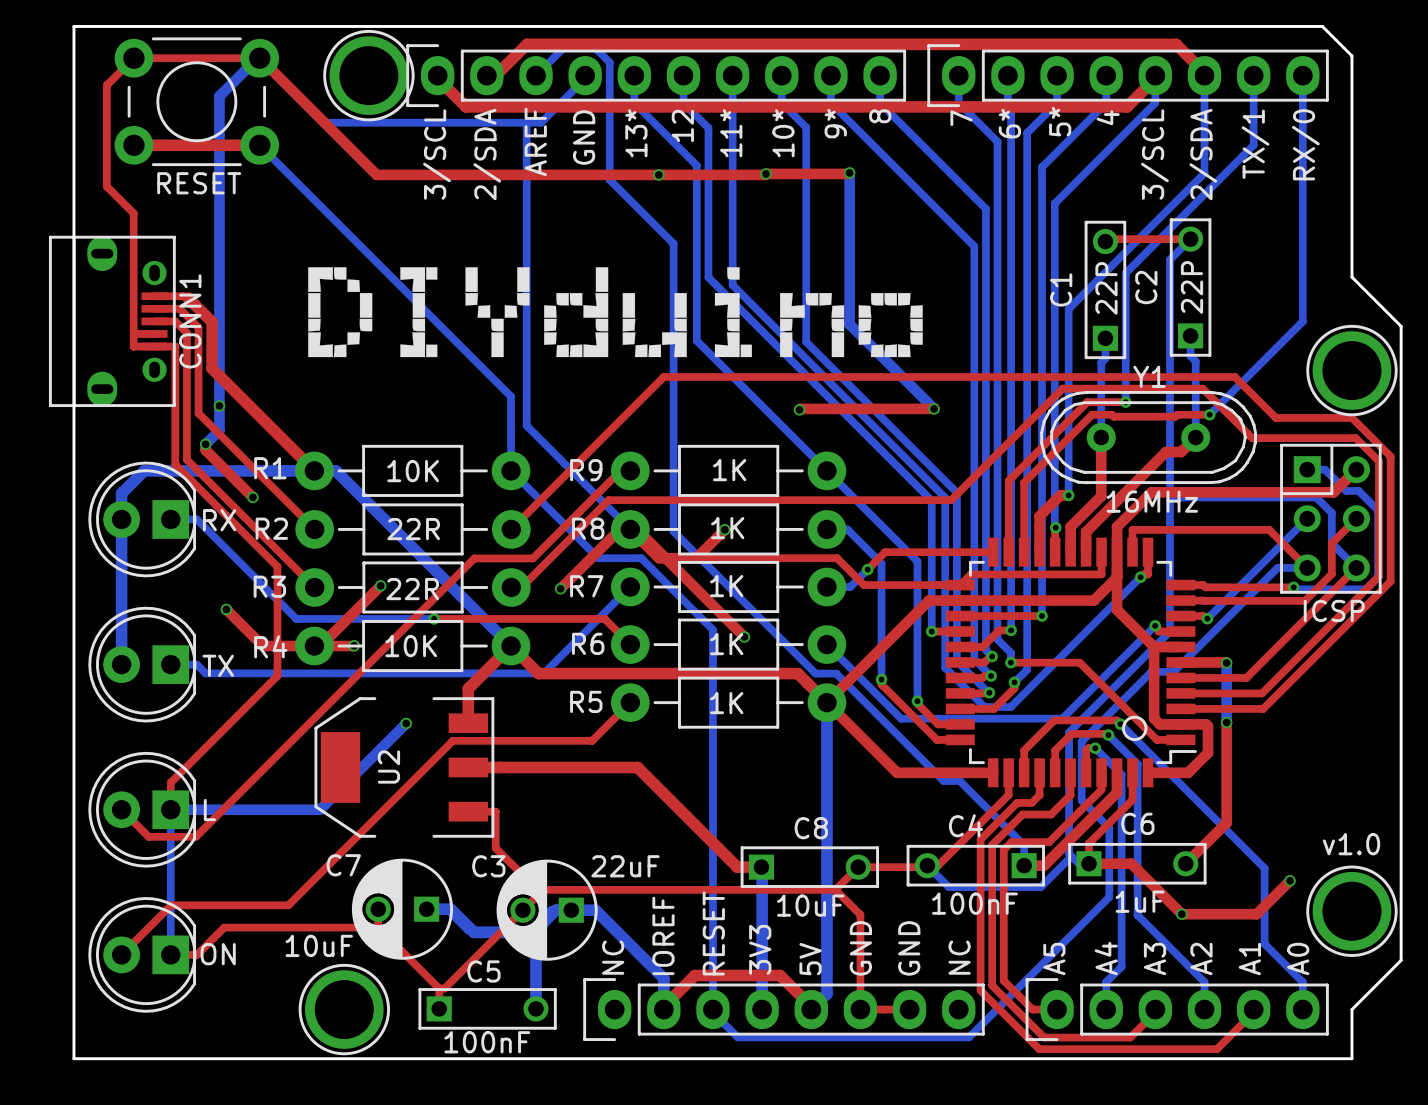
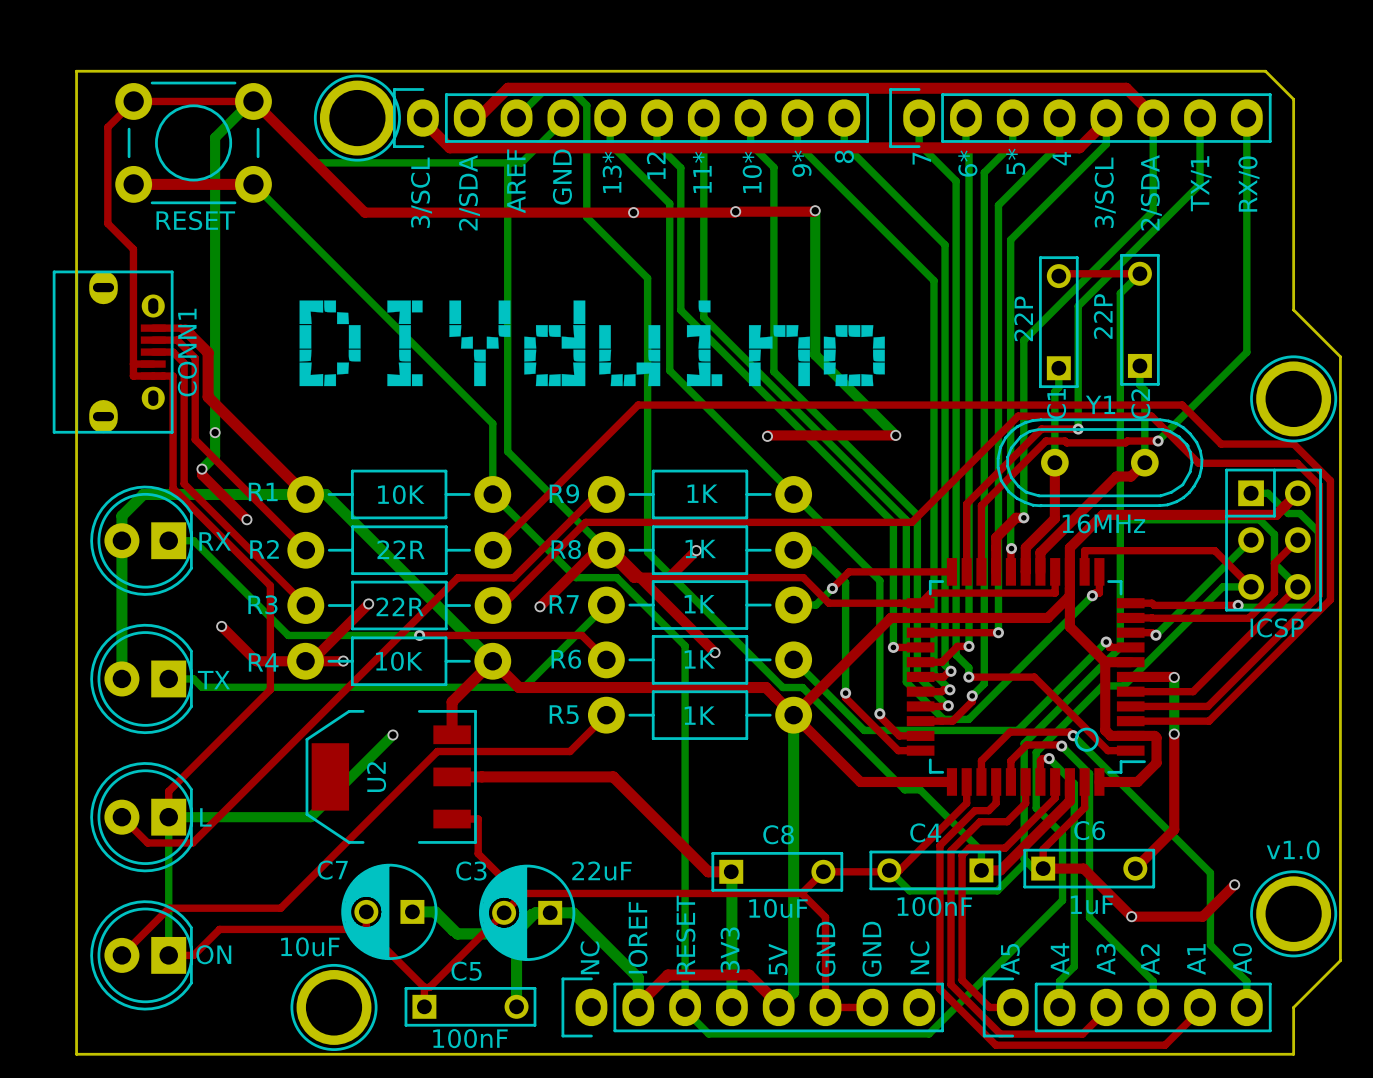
C2 name position: C2 (1146, 287) -> C2 (1140, 404)
text position: 22P (1191, 287) -> 22P (1103, 316)
text position: 22P (1106, 288) -> 22P (1023, 318)
C1 name position: C1 (1061, 289) -> C1 (1056, 404)

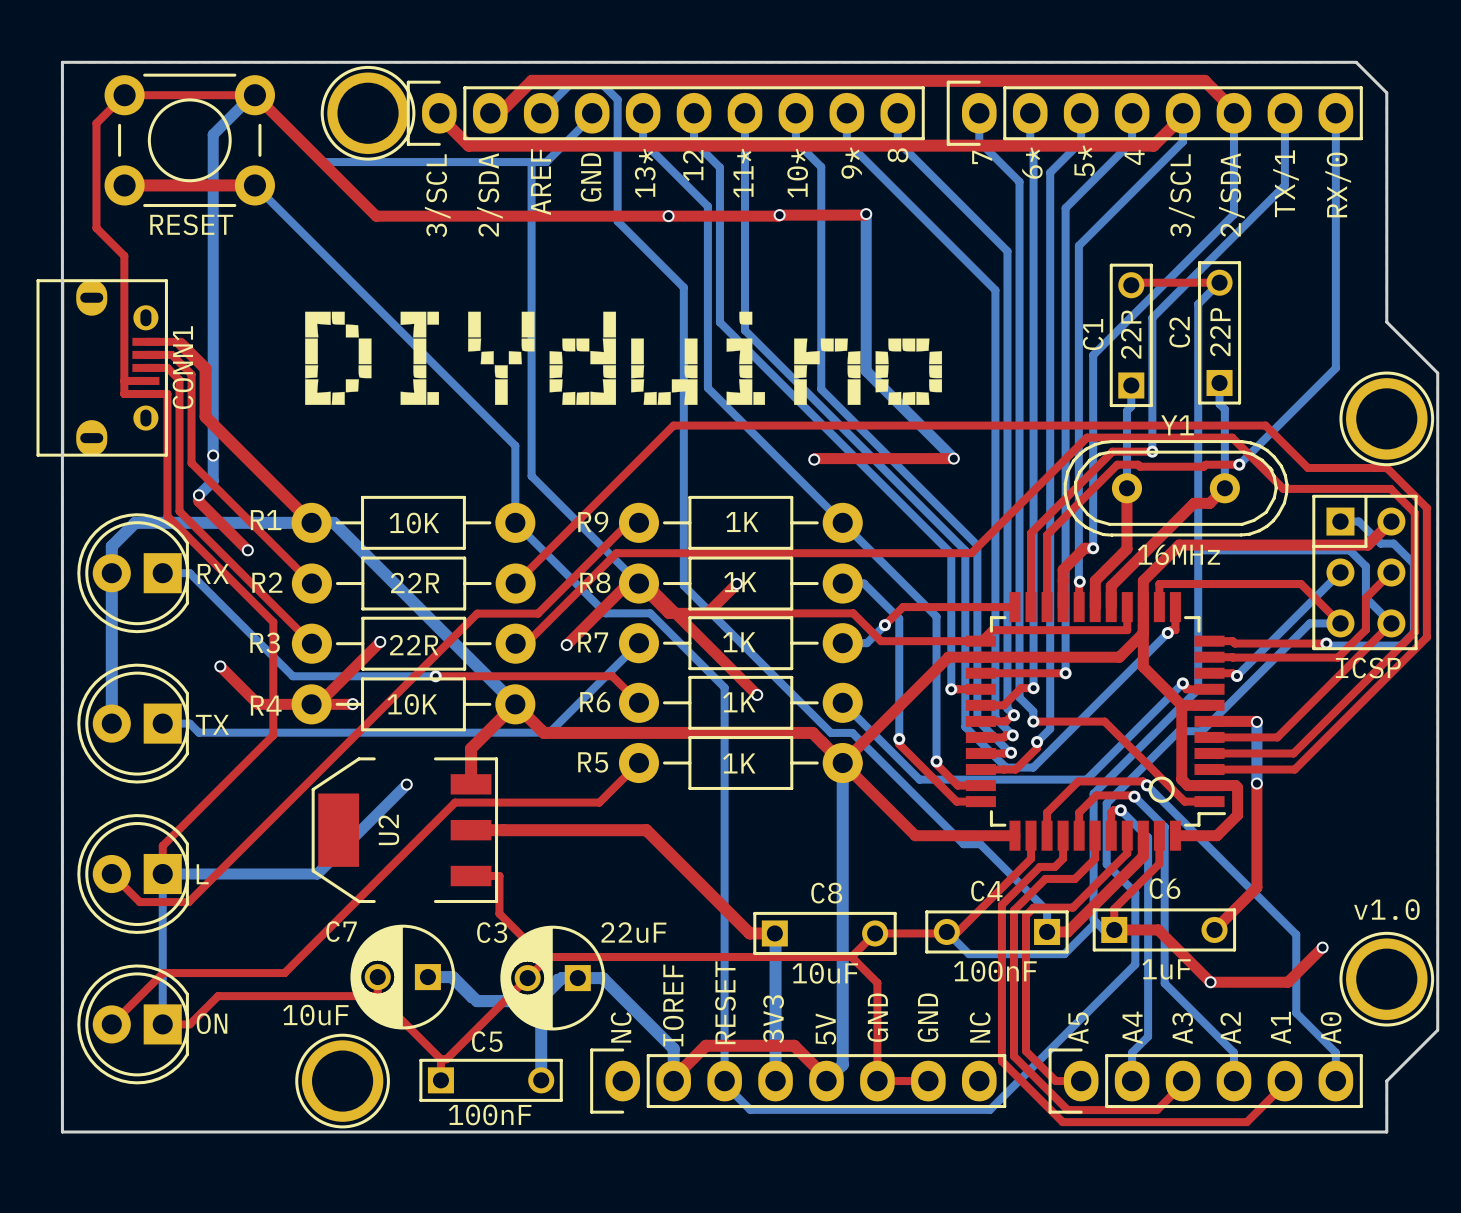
text position: 22P (1103, 316) -> 22P (1220, 332)
text position: 22P (1023, 318) -> 22P (1131, 334)
C1 name position: C1 (1056, 404) -> C1 (1093, 334)
C2 name position: C2 (1140, 404) -> C2 (1179, 332)

